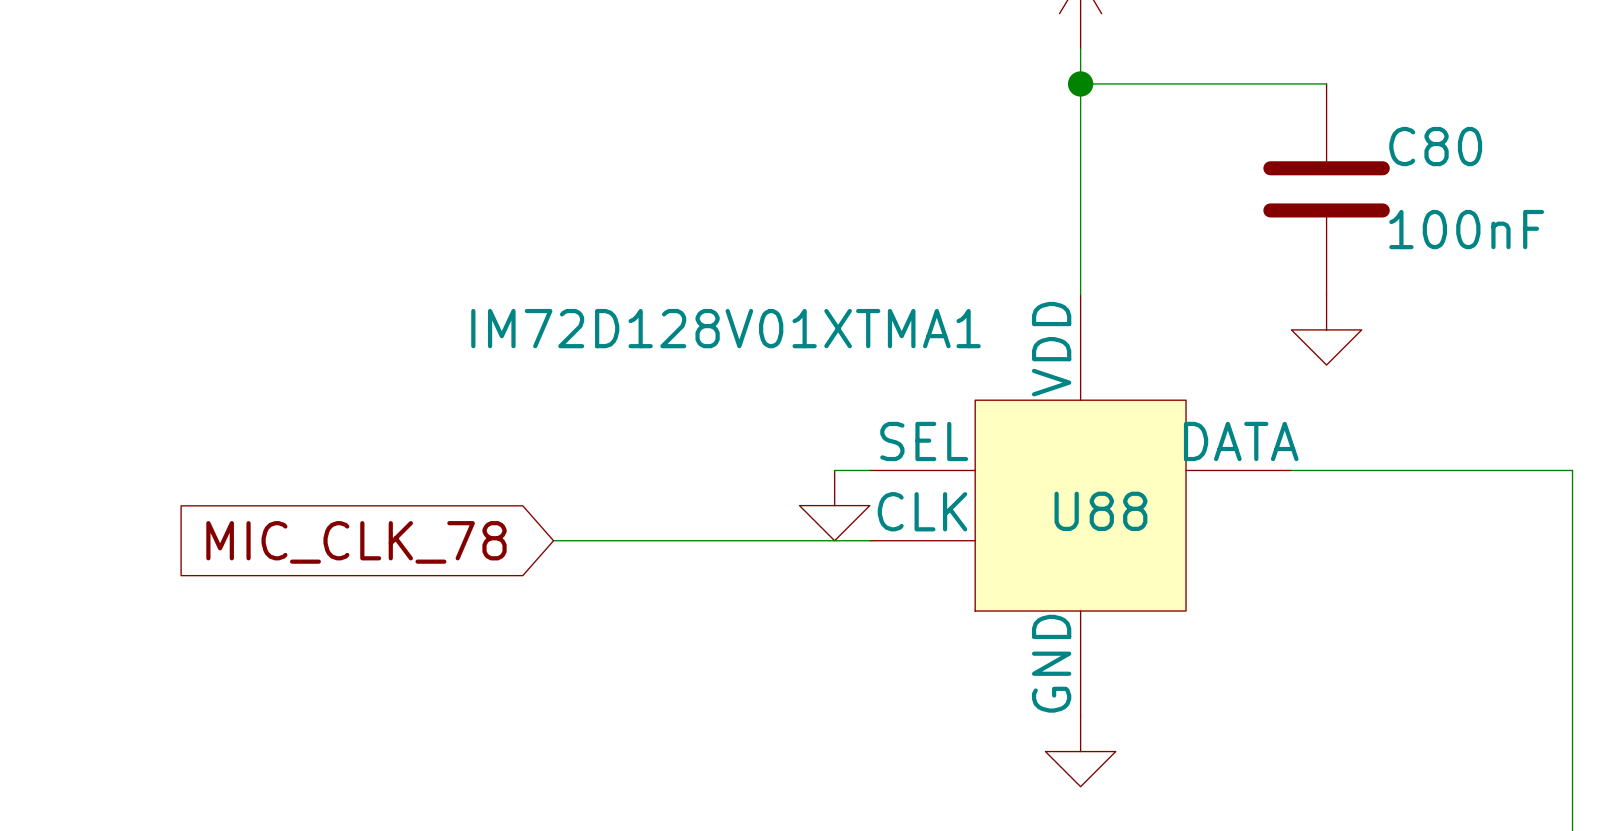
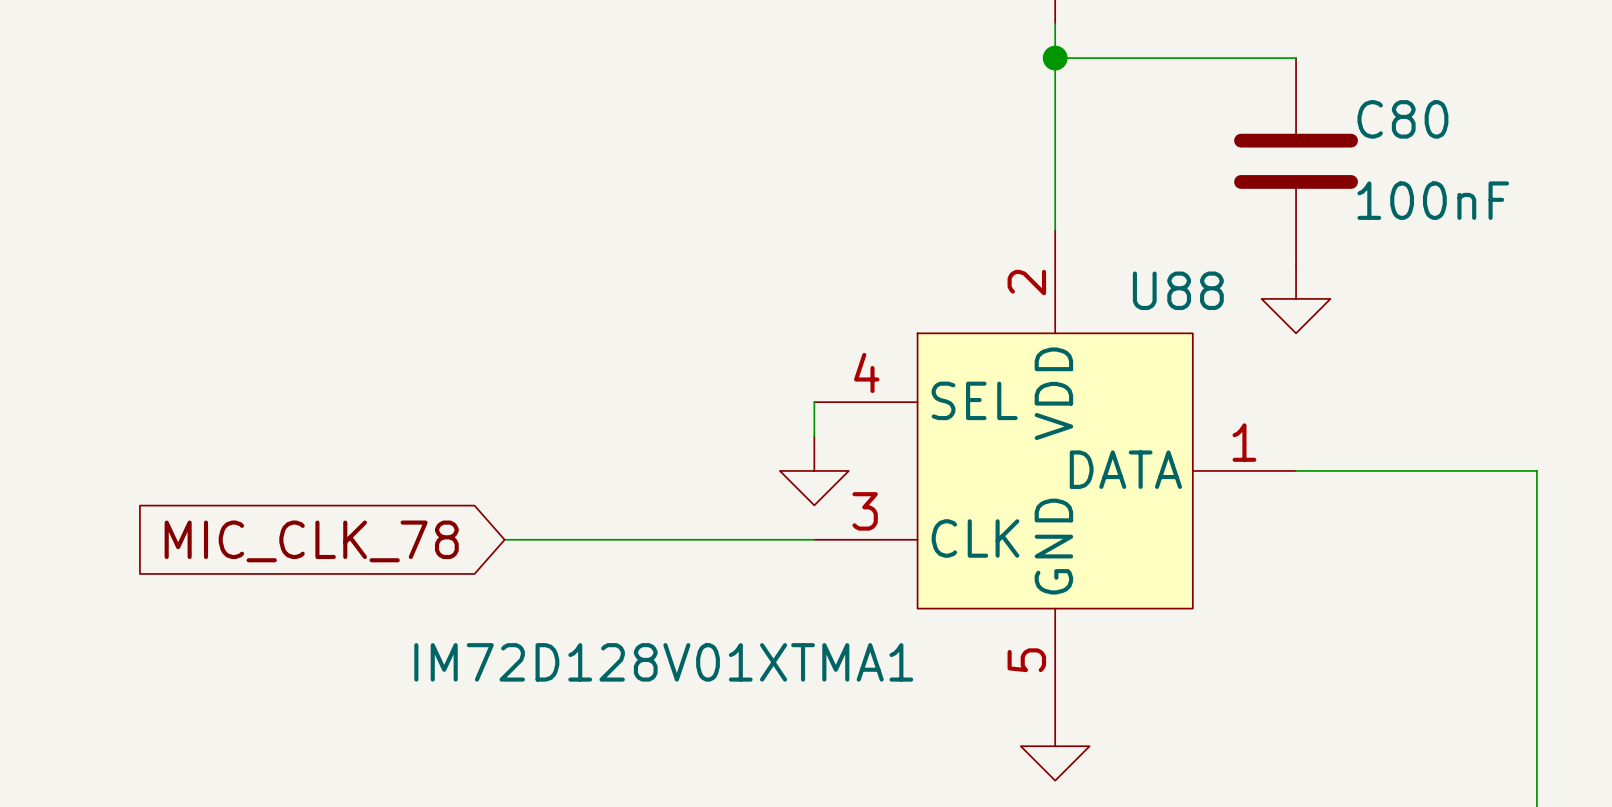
U88 symbol: [869, 294, 1292, 717] -> [814, 230, 1297, 712]
U88 value position: IM72D128V01XTMA1 (725, 328) -> IM72D128V01XTMA1 (663, 662)
wire: (834, 470) (869, 470) -> (814, 436) (814, 402)
wire: (1291, 470) (1572, 470) (1572, 505) -> (1296, 470) (1536, 470)
U88 name position: U88 (1100, 511) -> U88 (1178, 290)
wire: (553, 540) (869, 540) -> (504, 539) (814, 539)
global label position: MIC_CLK_78 (356, 542) -> MIC_CLK_78 (311, 541)
power symbol position: (1080, 751) -> (1055, 746)

